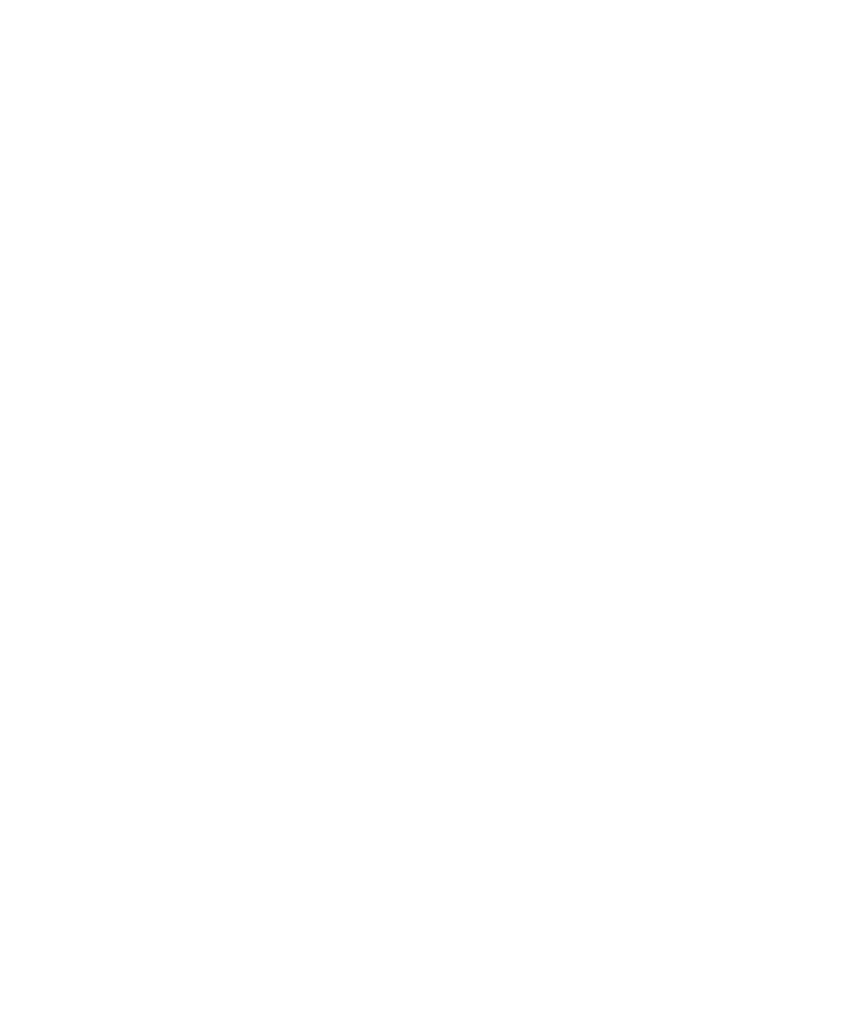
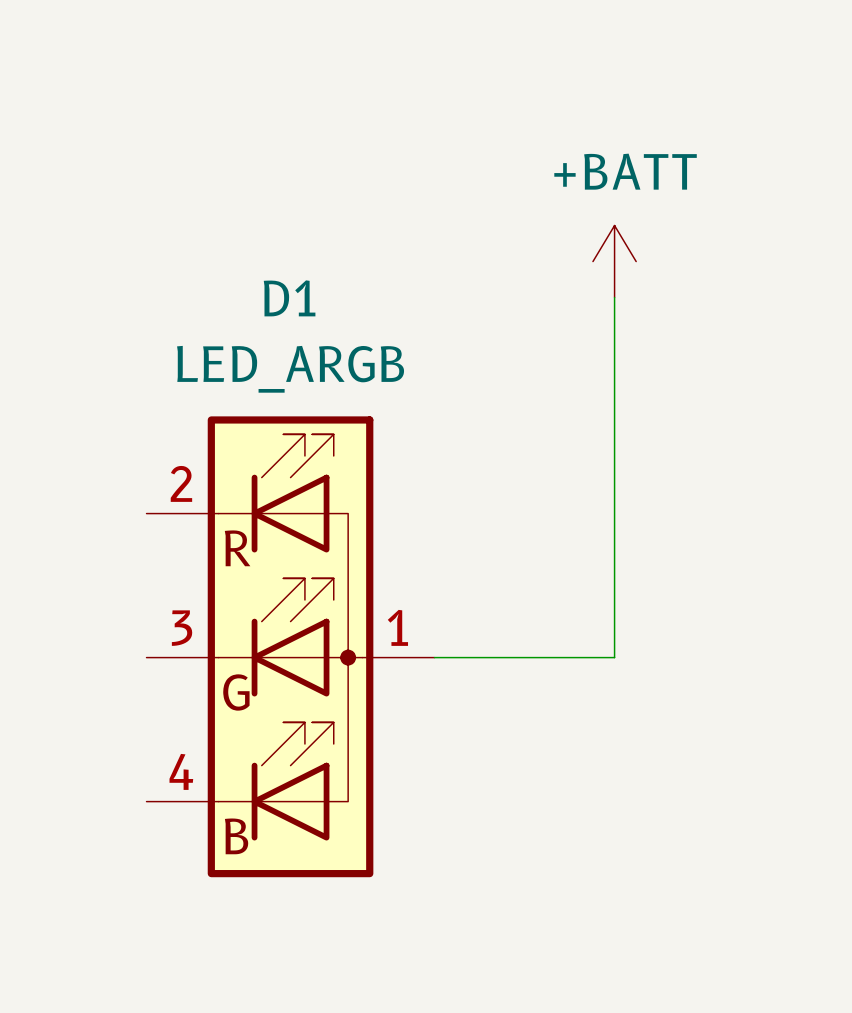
power symbol: none -> +BATT (614, 261)
wire: none -> (614, 297) (614, 657) (434, 657)
D1: none -> LED_ARGB (290, 646)

